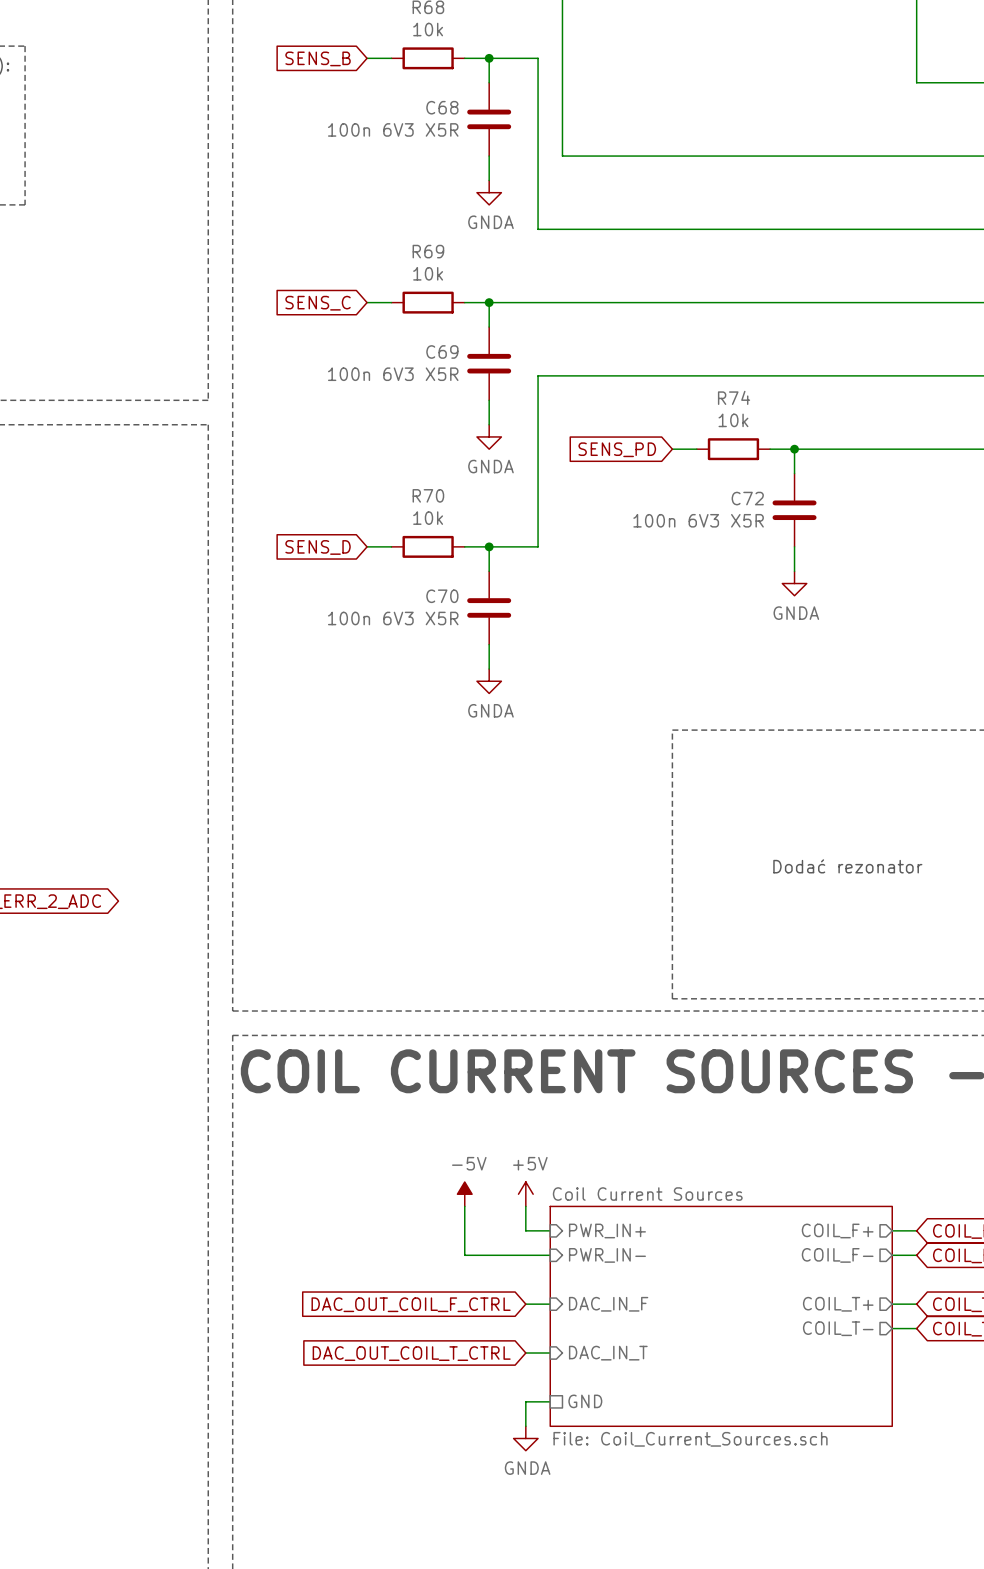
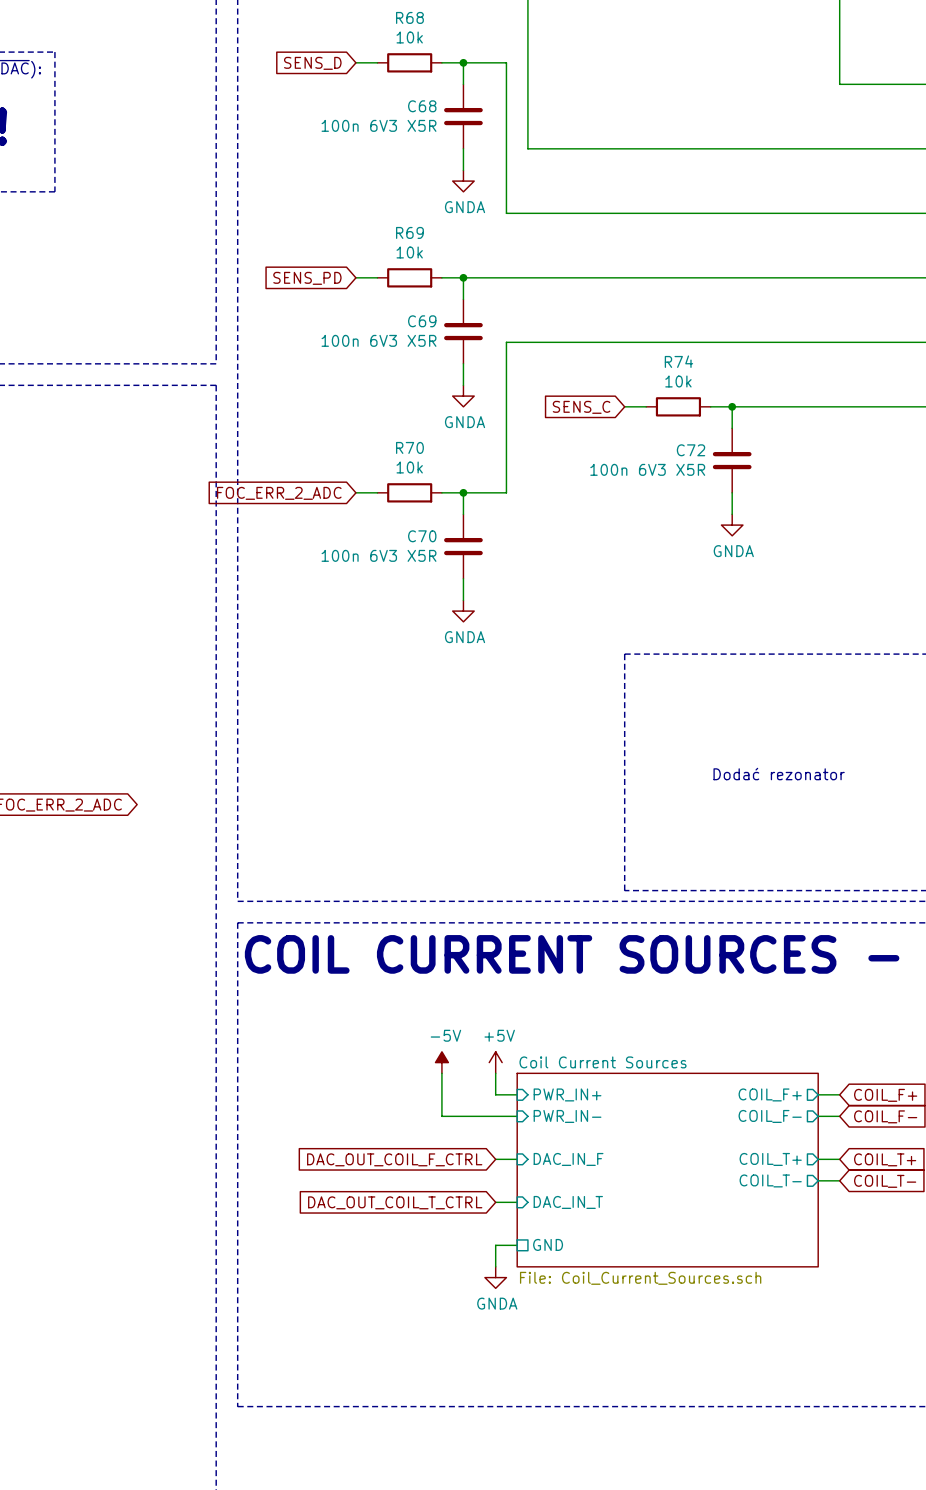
global label: SENS_B (318, 58) -> SENS_D (312, 63)
global label: SENS_C (318, 303) -> SENS_PD (307, 278)
global label: SENS_PD (617, 449) -> SENS_C (581, 407)
global label: SENS_D (318, 547) -> FOC_ERR_2_ADC (279, 493)

